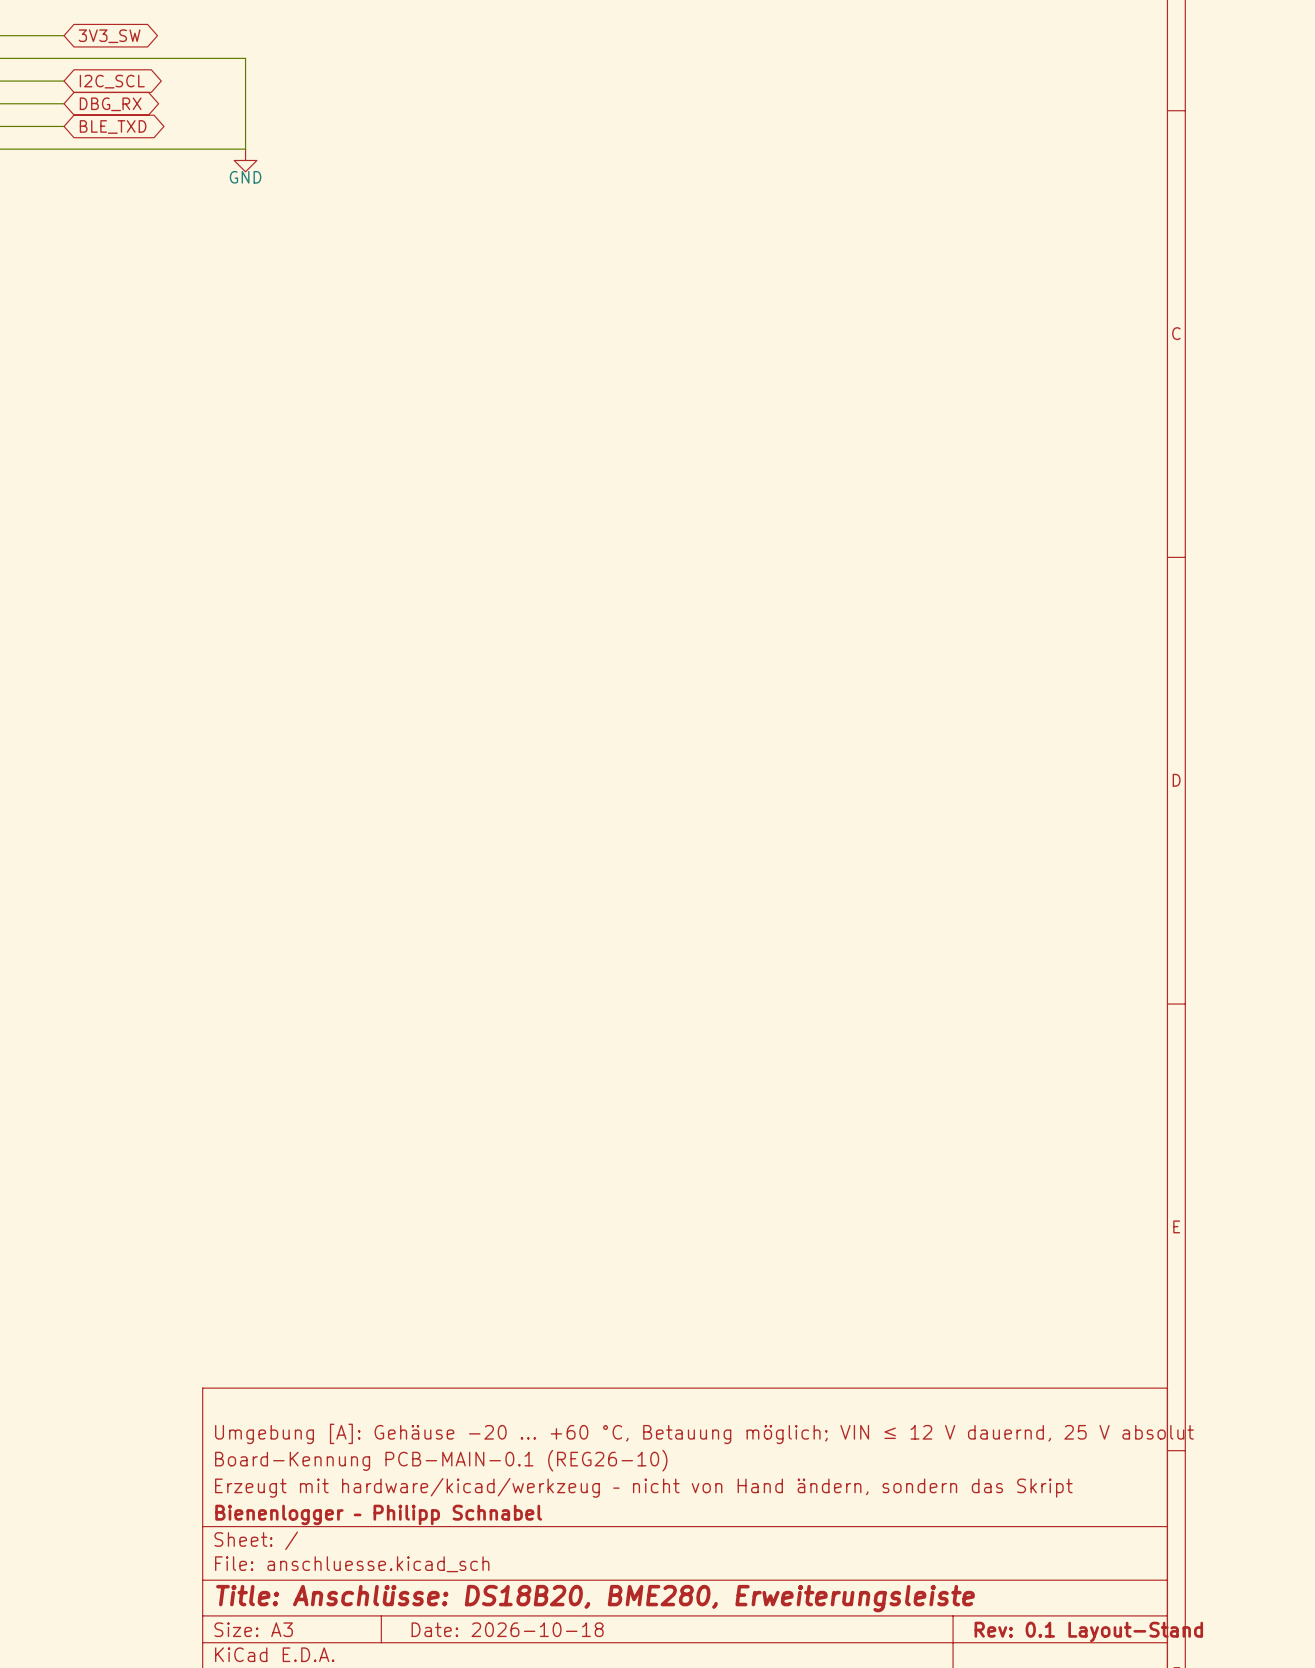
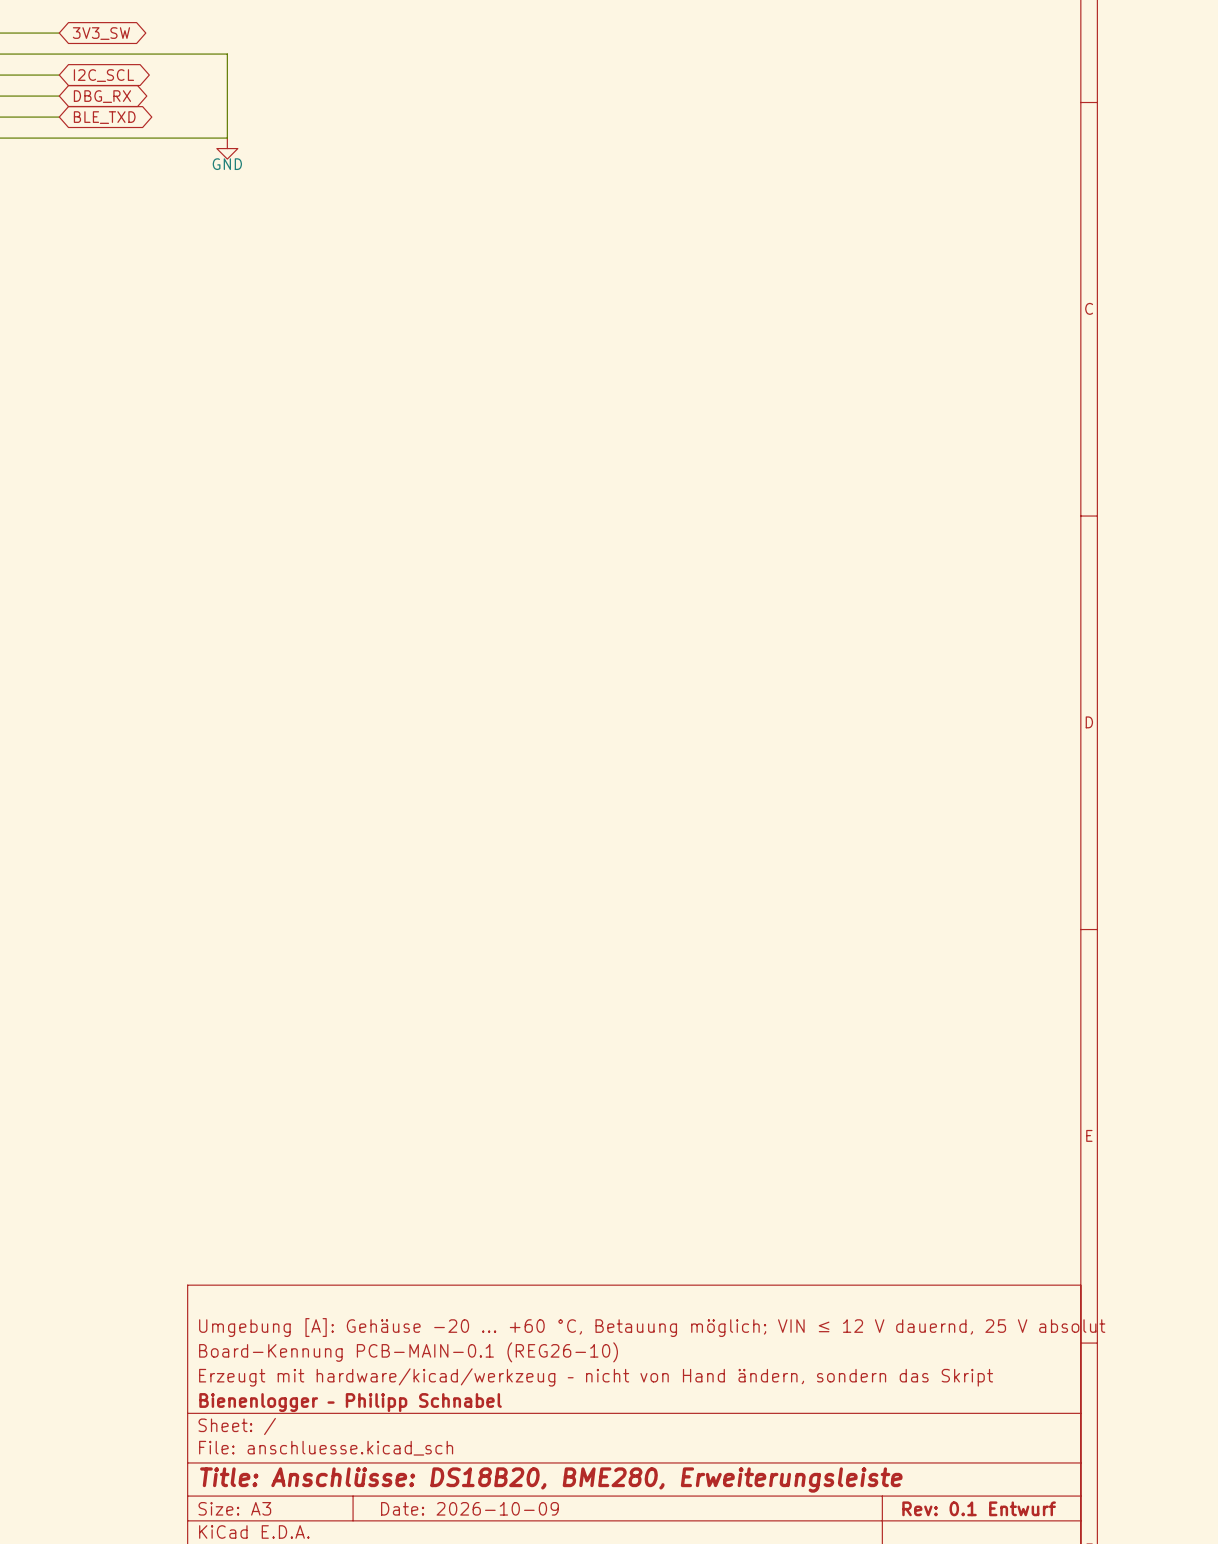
title block: Date: 2026-10-18 (507, 1629) -> Date: 2026-10-09 (469, 1508)
title block: Rev: 0.1 Layout-Stand (1088, 1631) -> Rev: 0.1 Entwurf (979, 1508)

